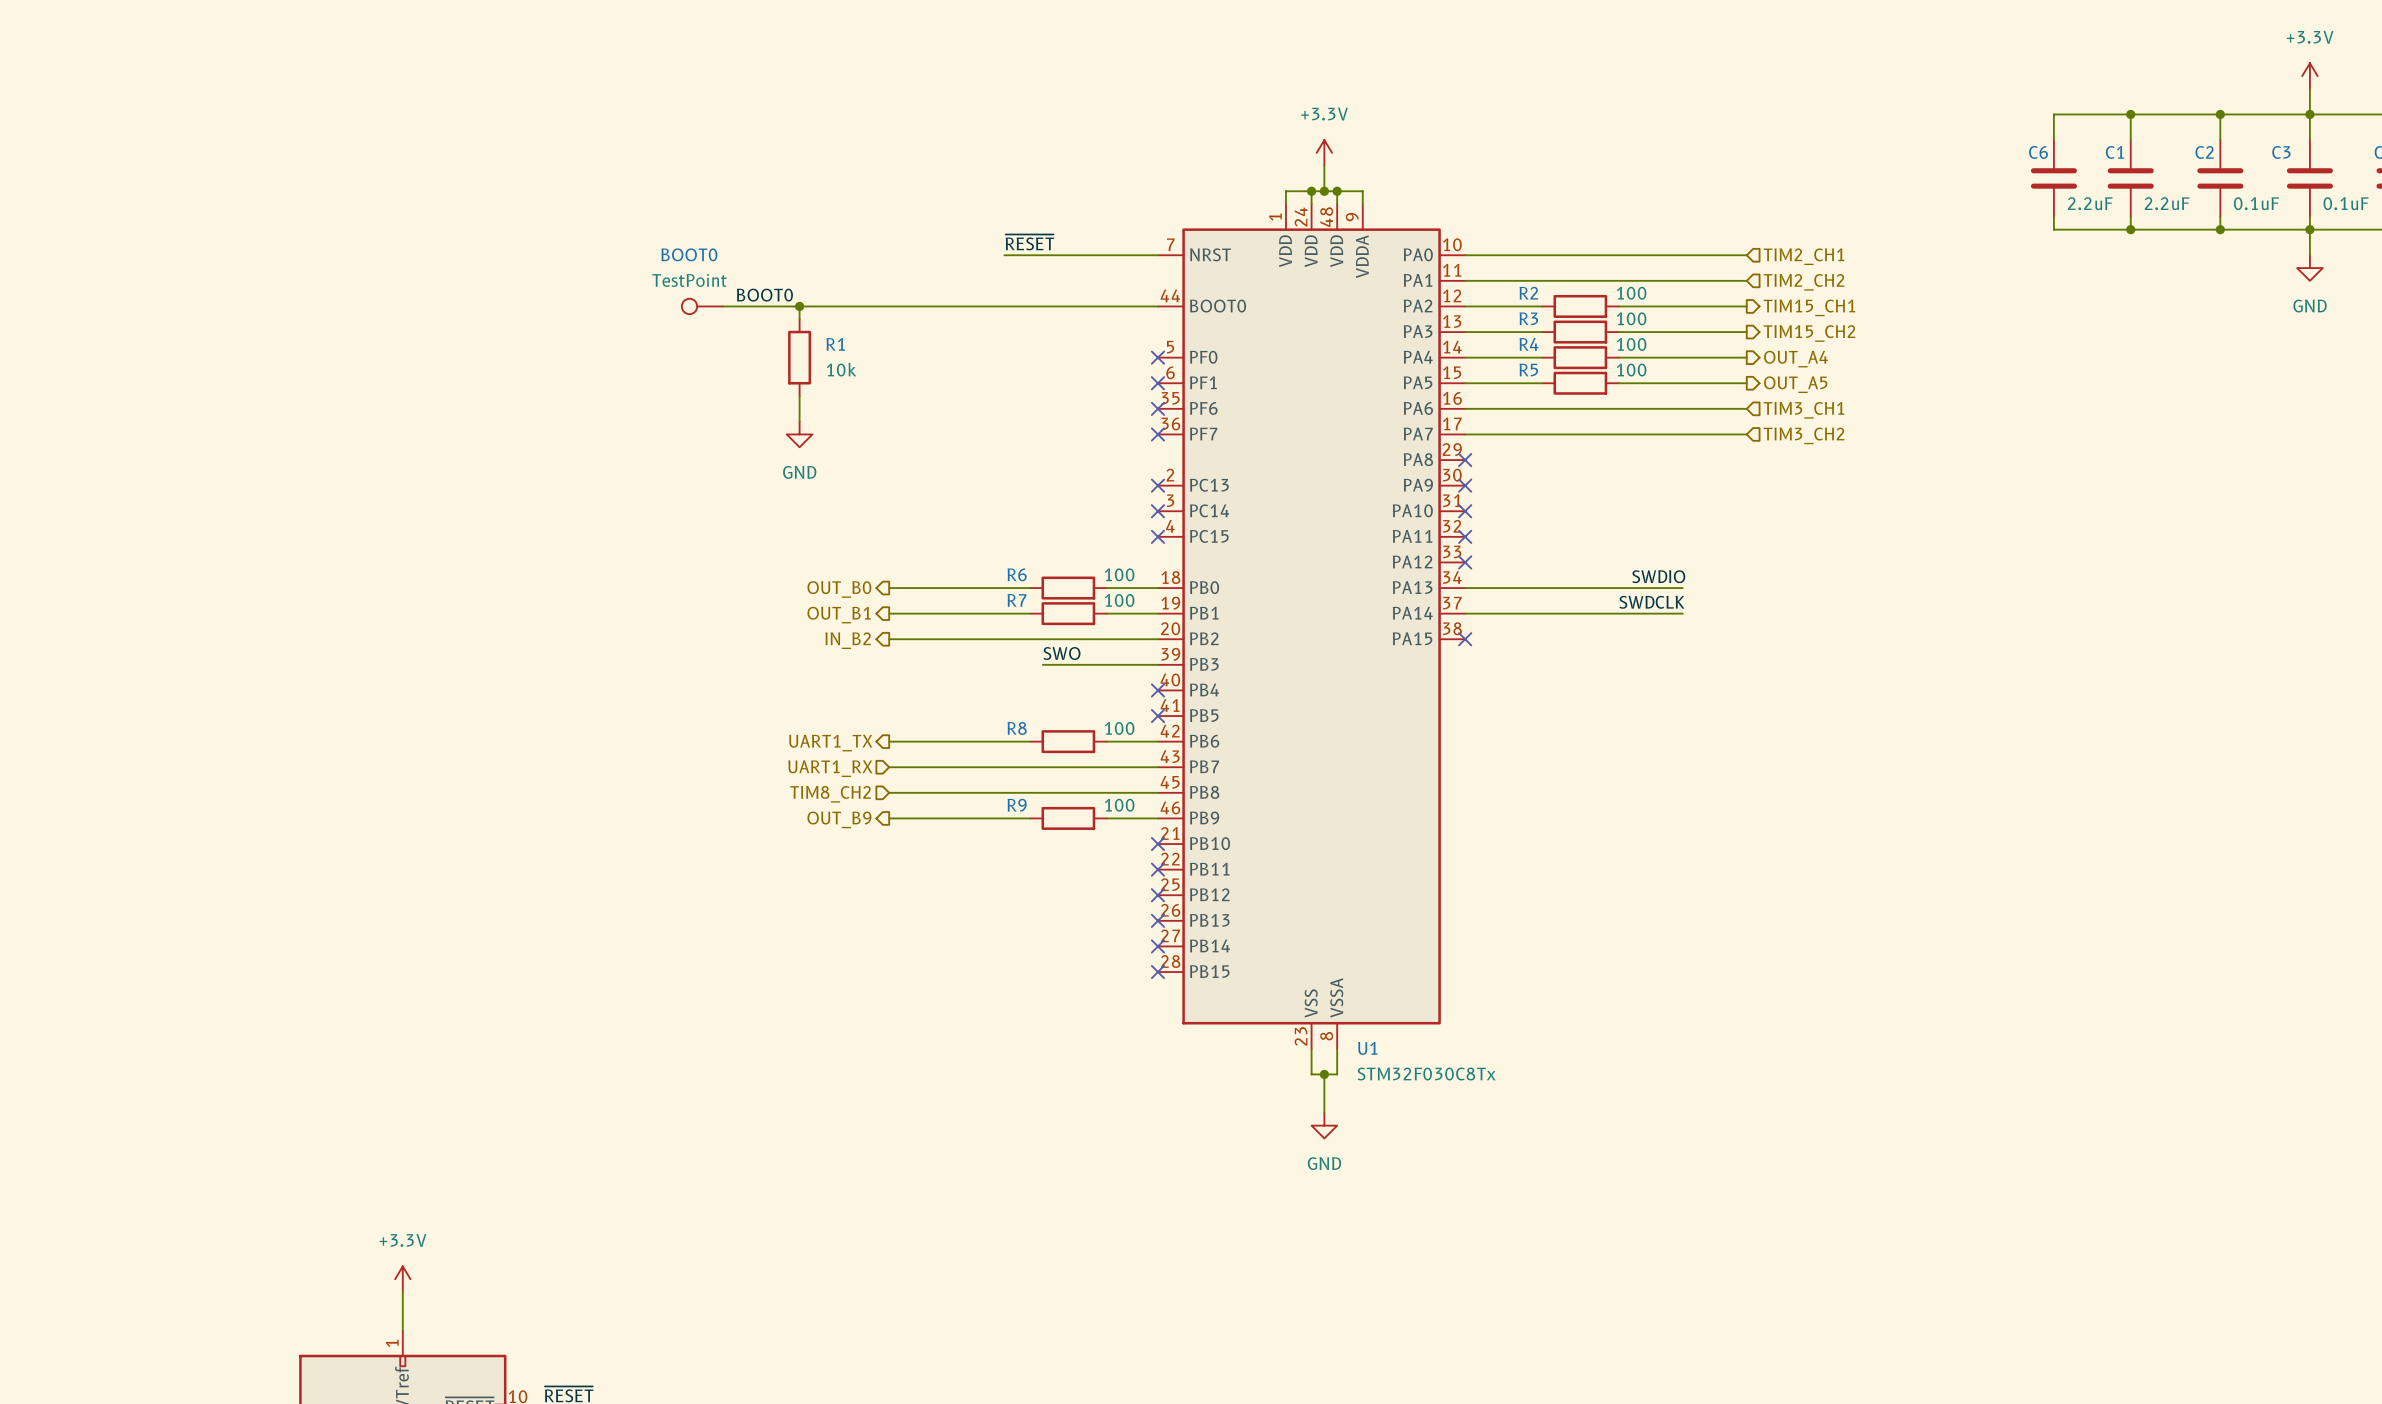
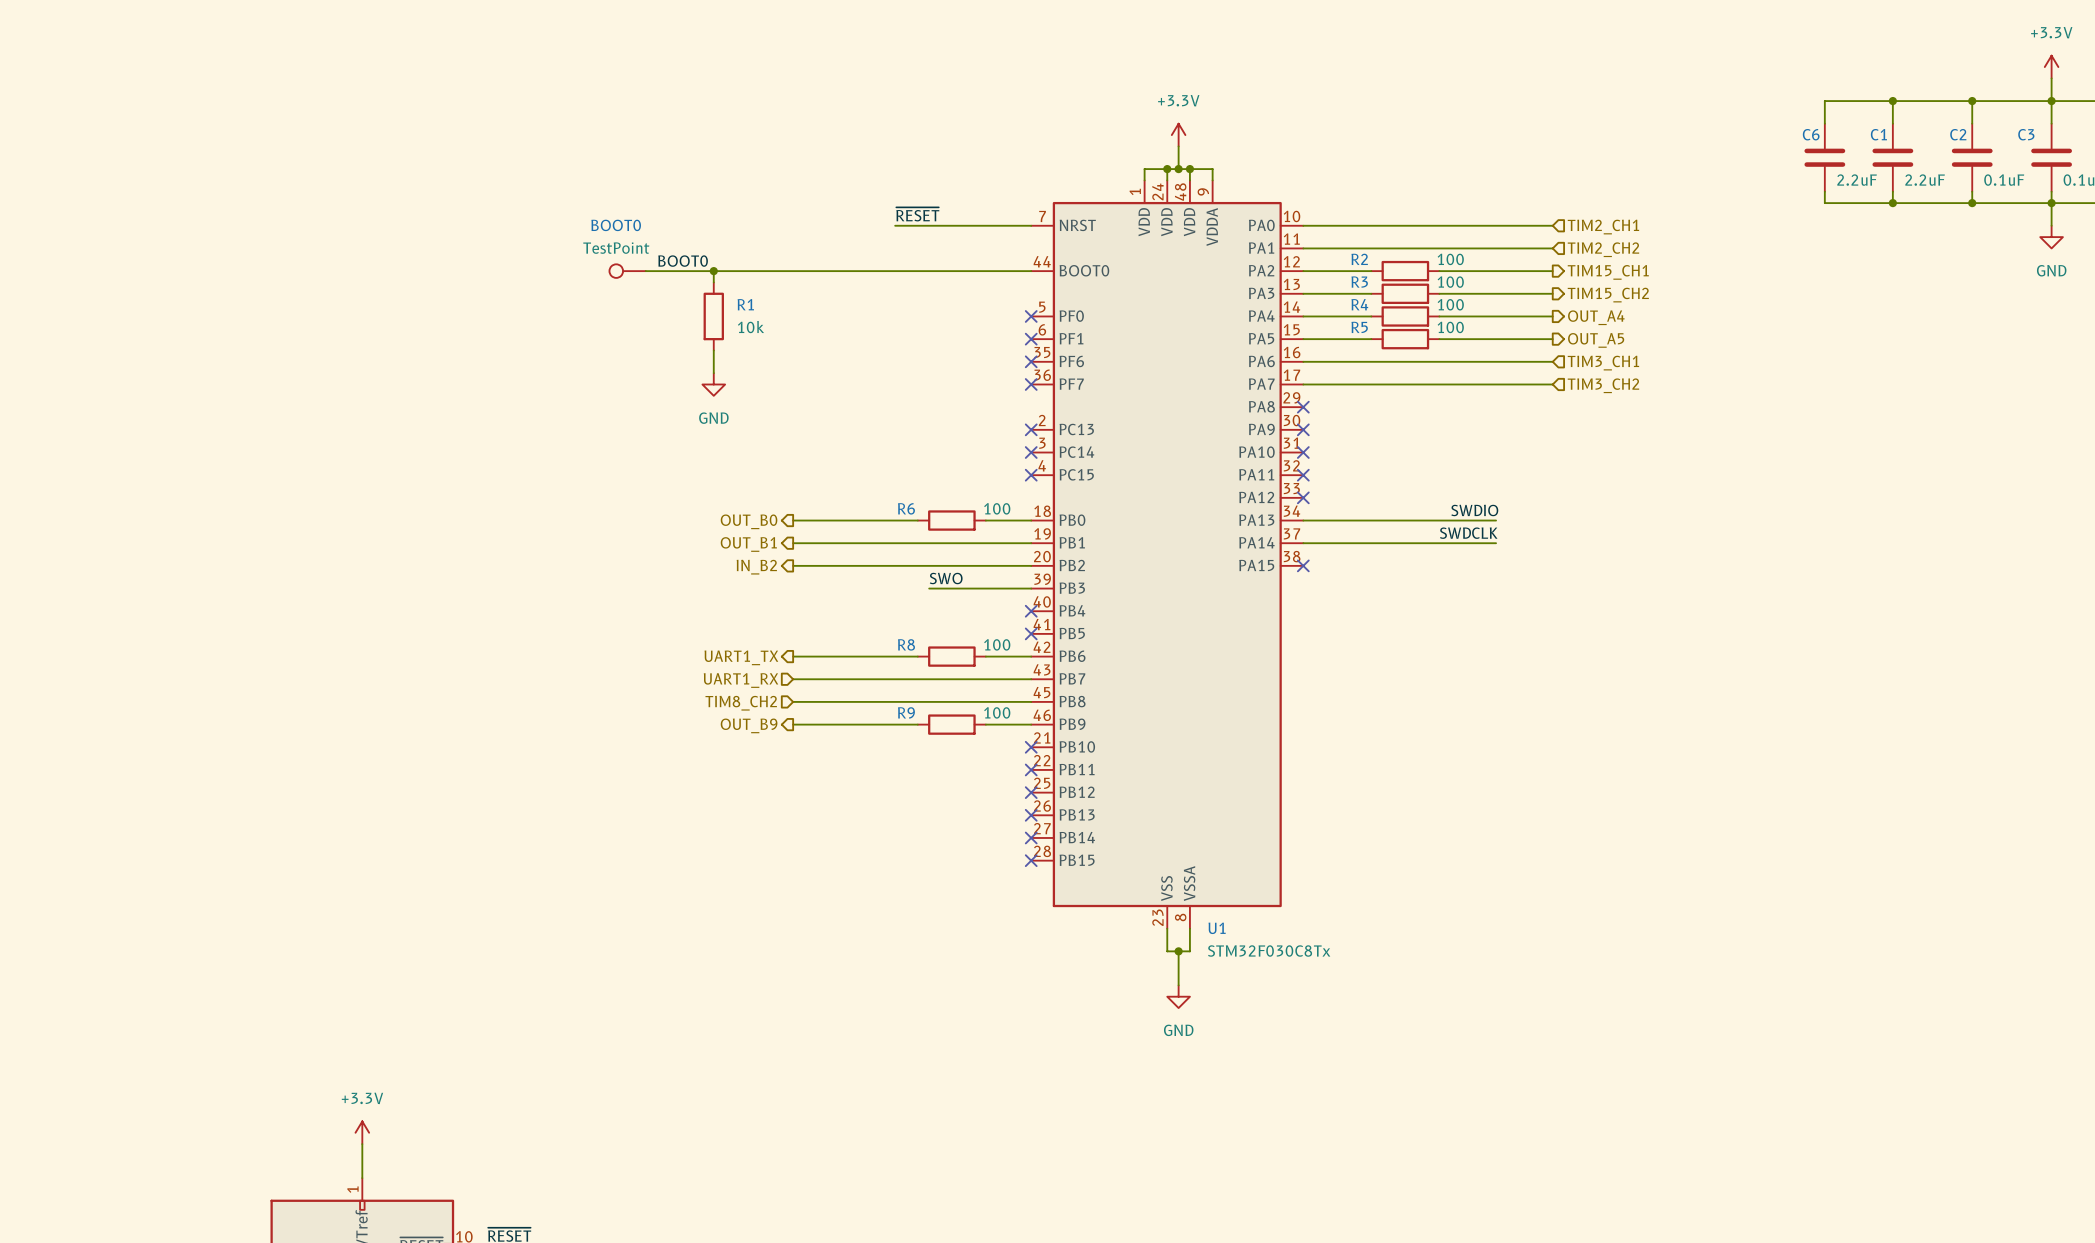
wire: none -> (917, 543) (985, 543)
R7: 100 (1068, 613) -> none

